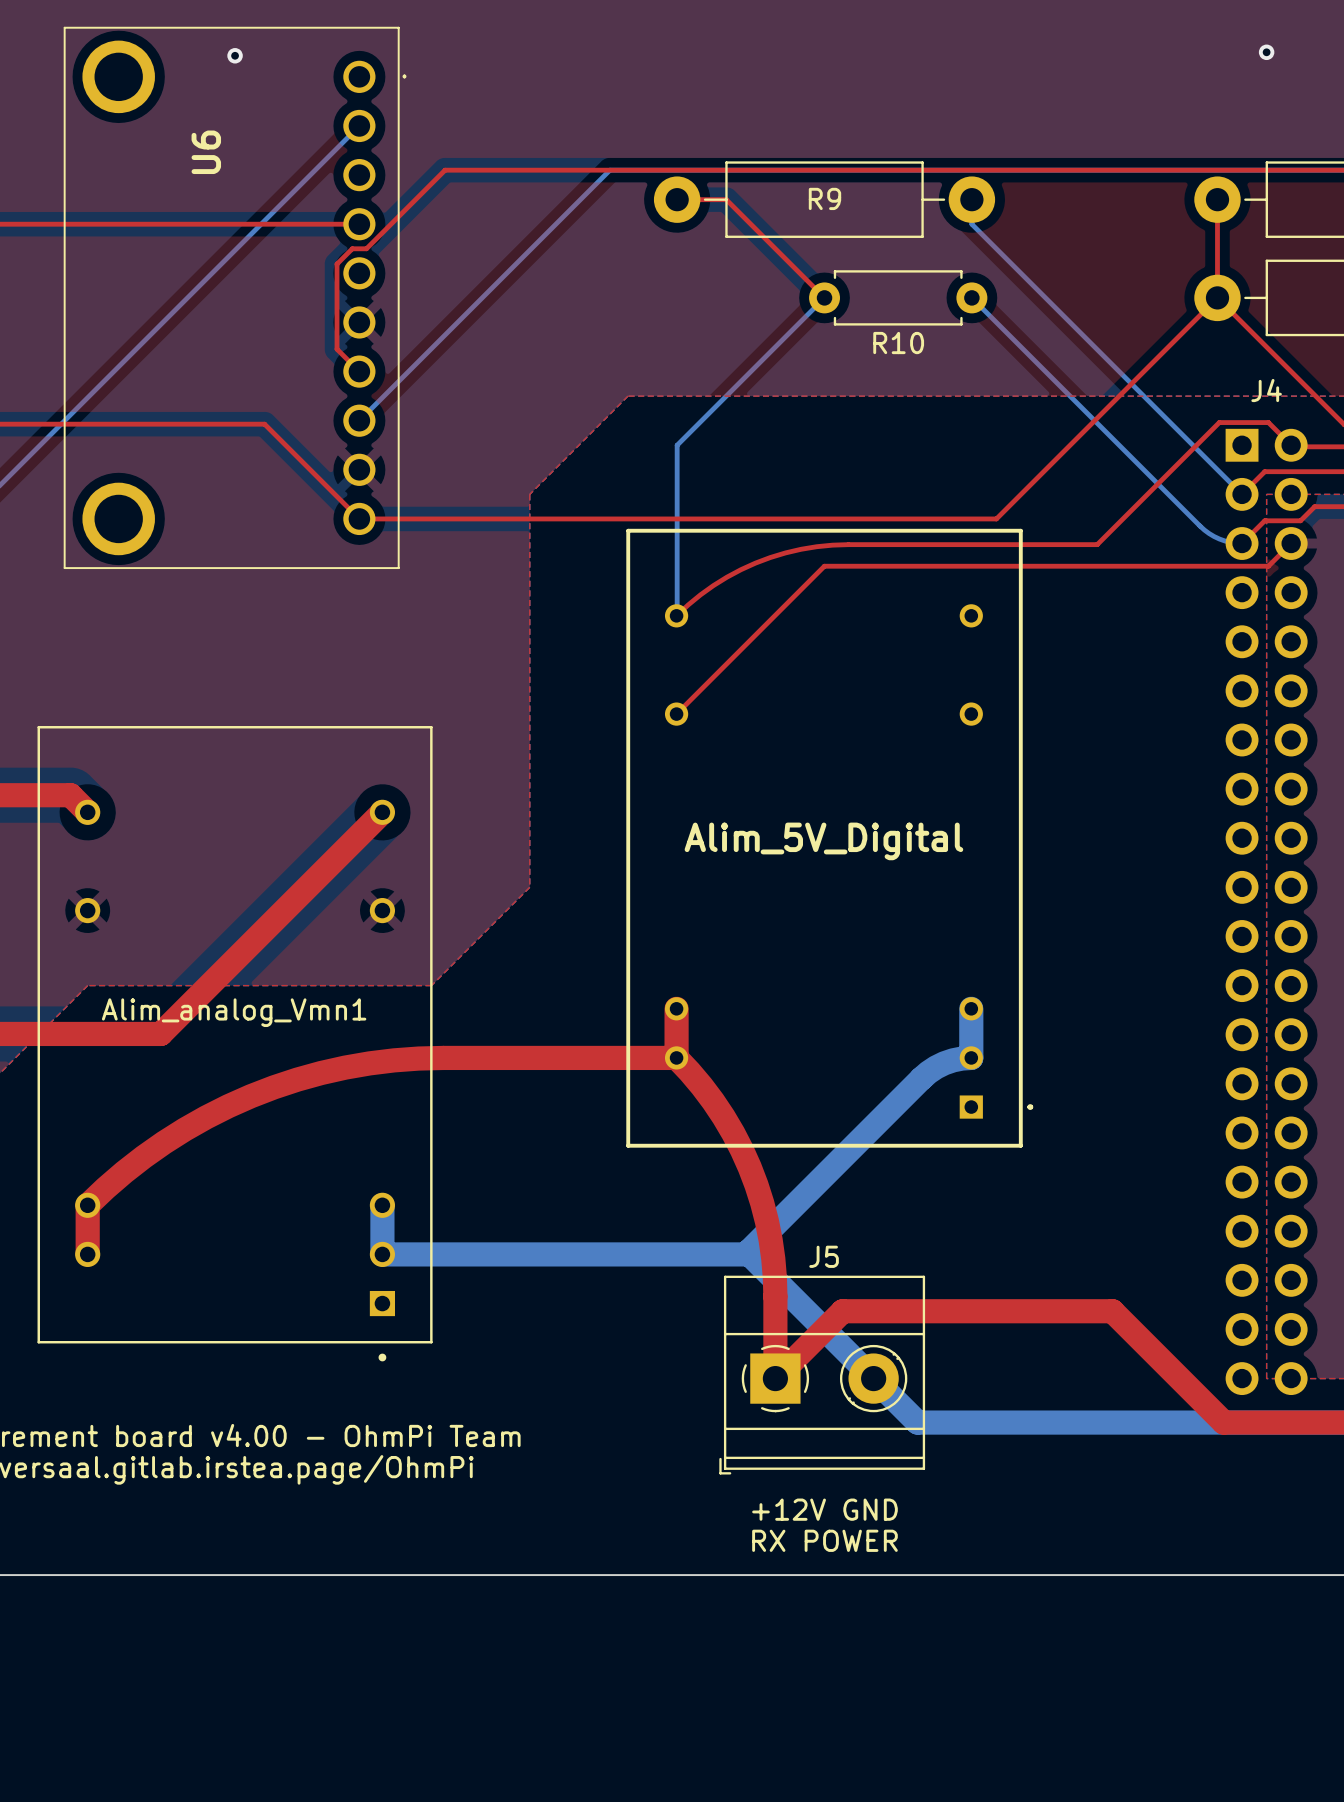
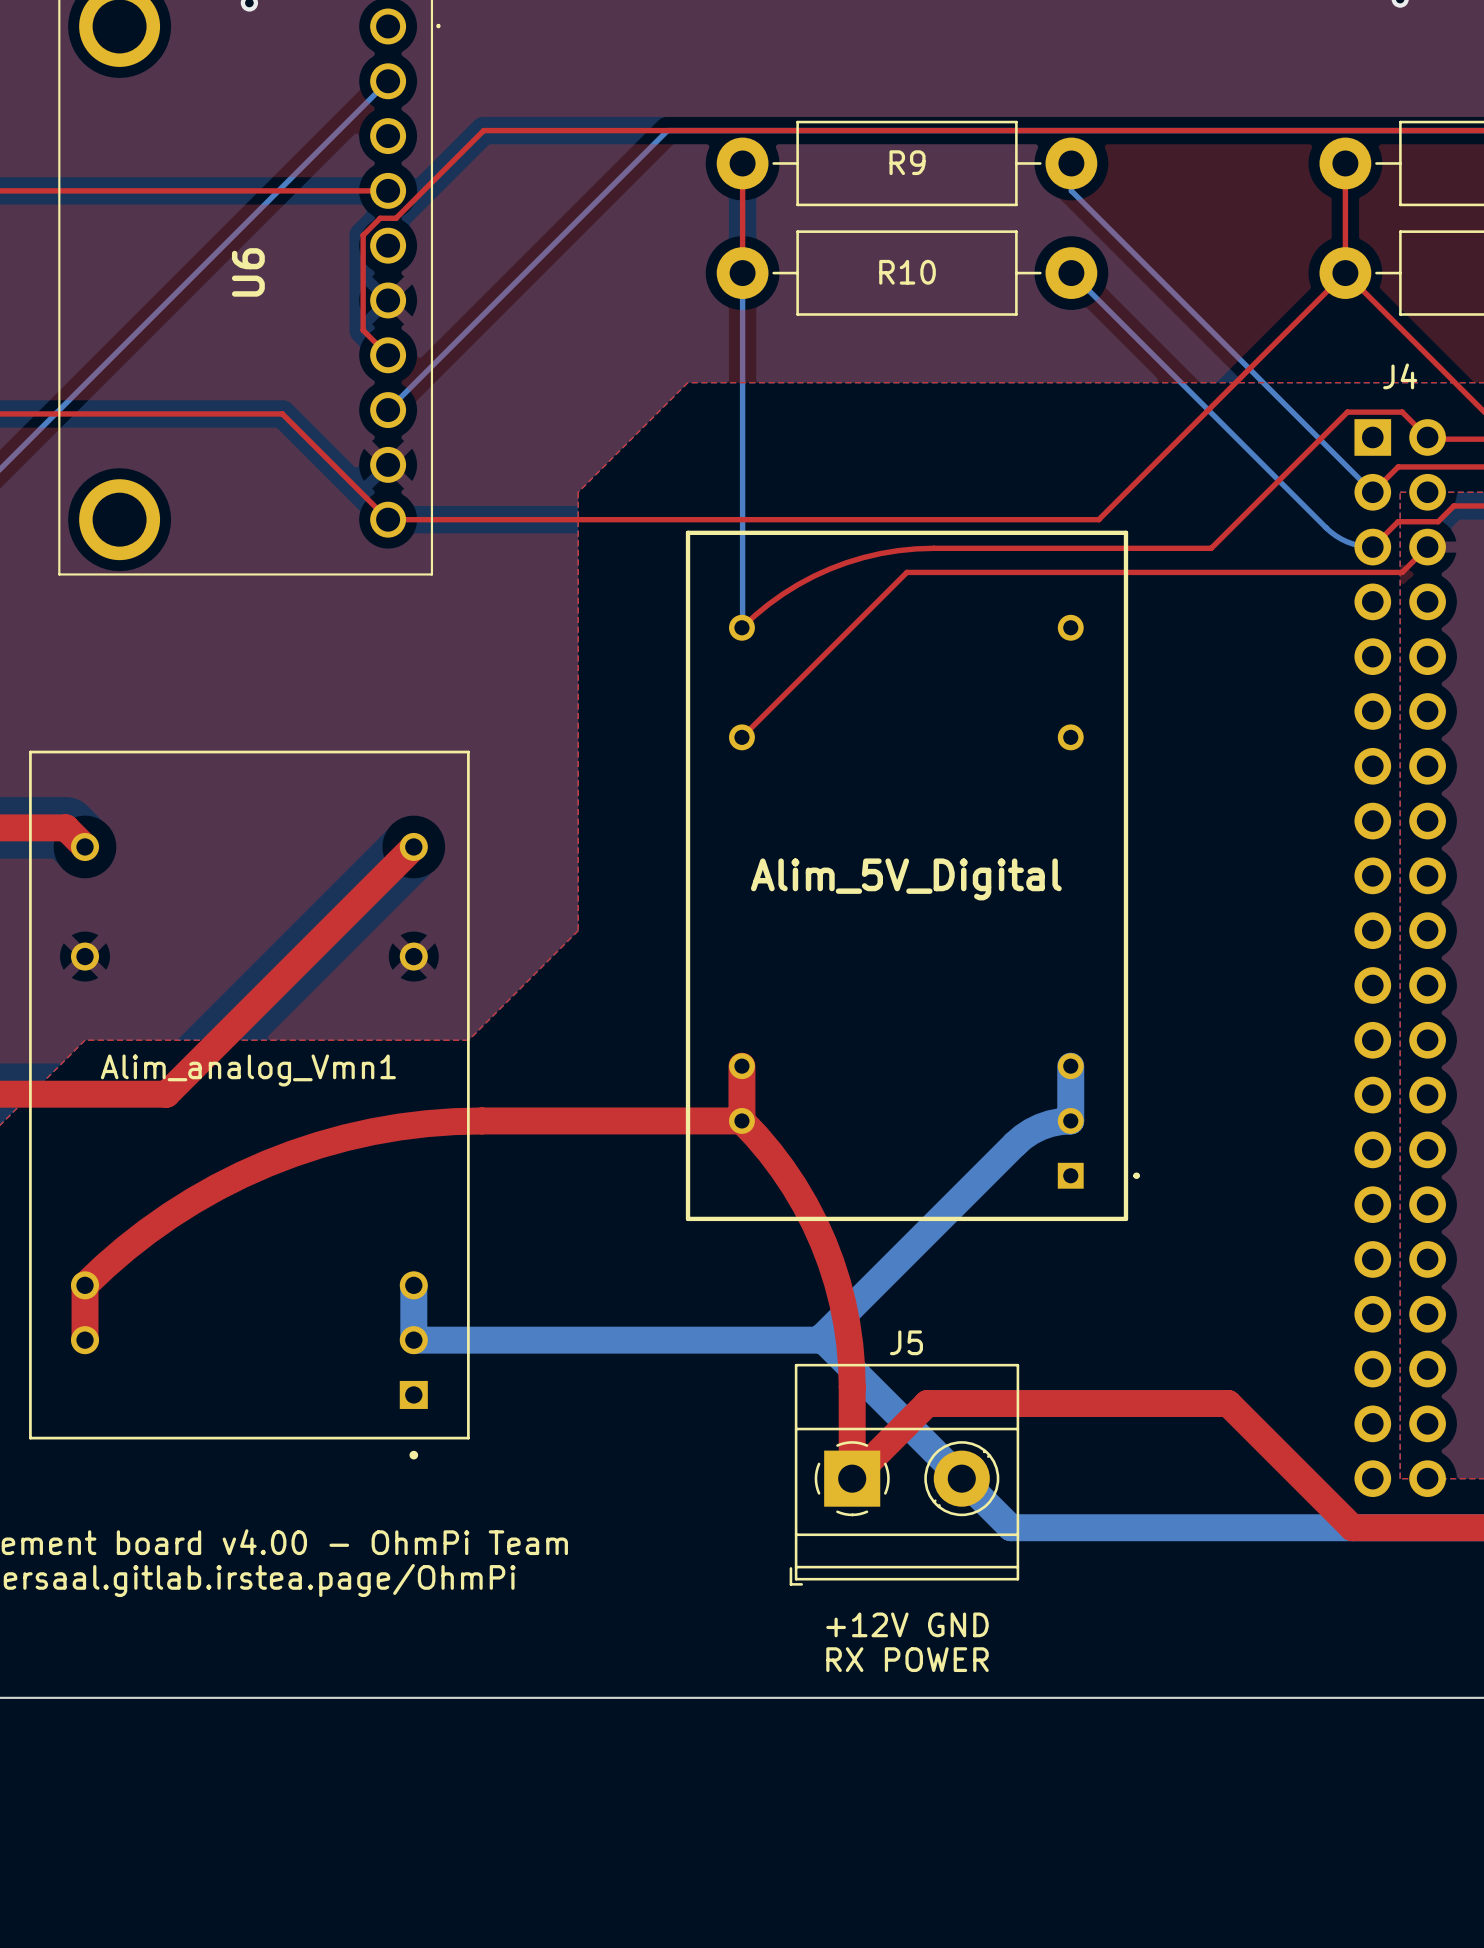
U6 name position: U6 (206, 152) -> U6 (248, 272)
top track: (677, 199) (726, 199) (824, 297) -> (742, 163) (742, 273)
R10 footprint: [809, 270, 988, 326] -> [716, 230, 1098, 316]
bottom track: (824, 297) (677, 445) -> (742, 273) (742, 437)
R10 name position: R10 (898, 343) -> R10 (907, 272)

